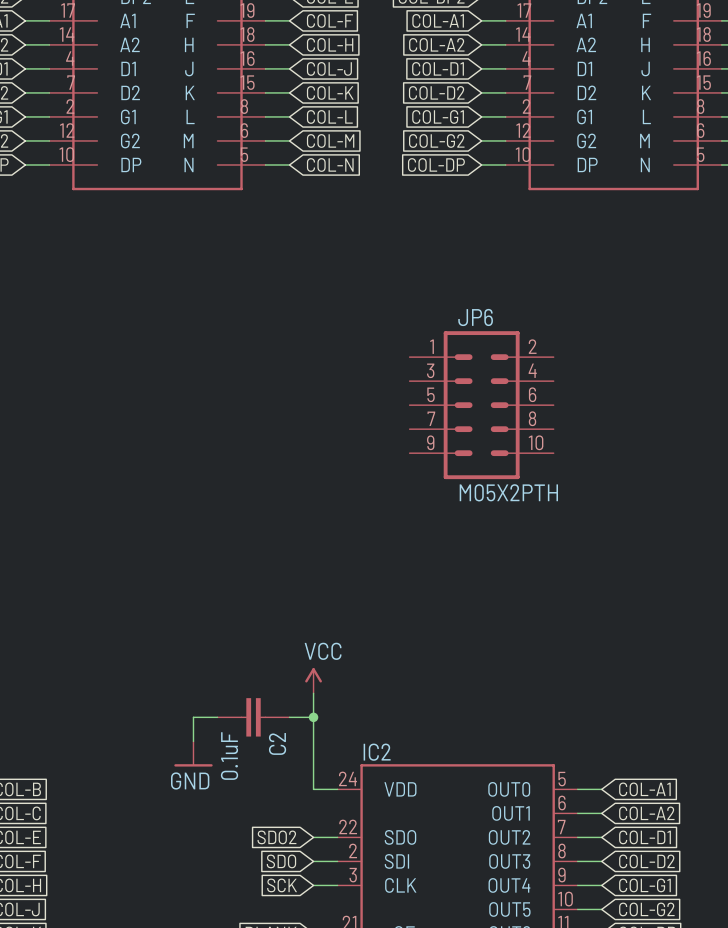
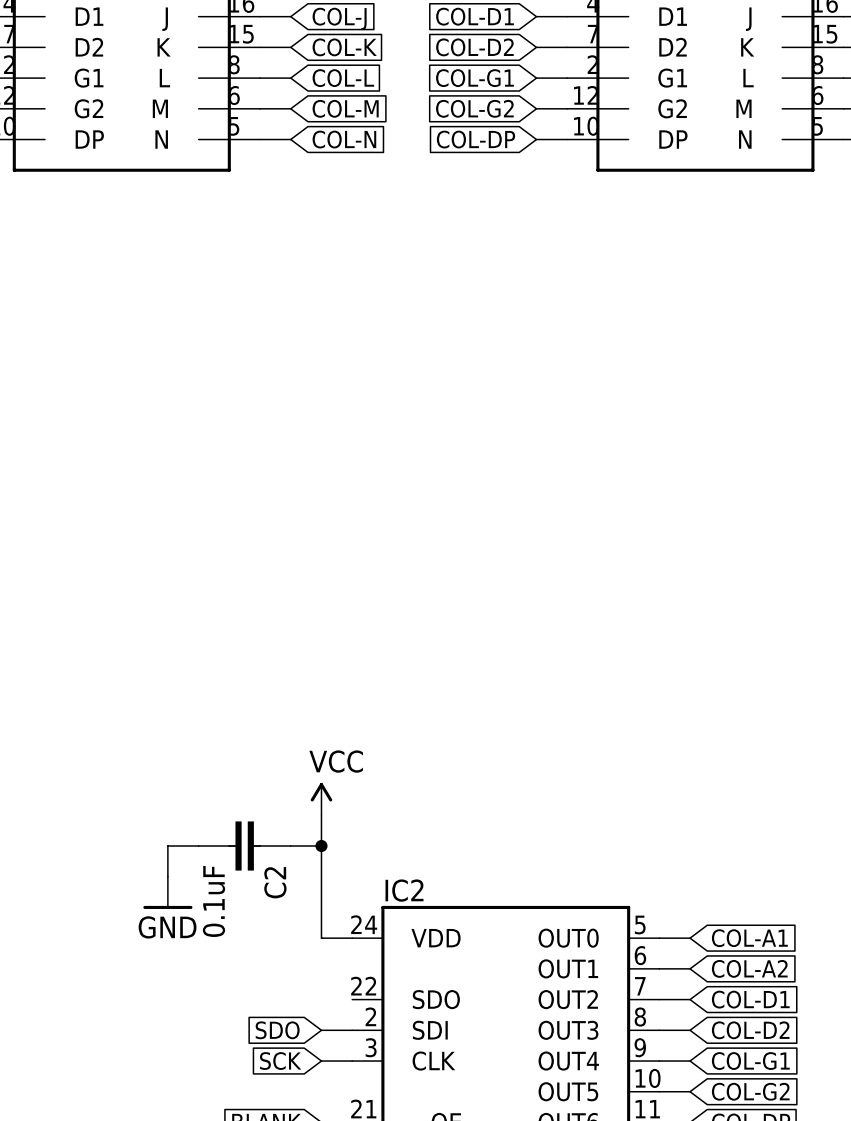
JP6: M05X2PTH (481, 405) -> none
global label: SDO2 (276, 837) -> none
wire: (313, 837) (337, 837) -> none

